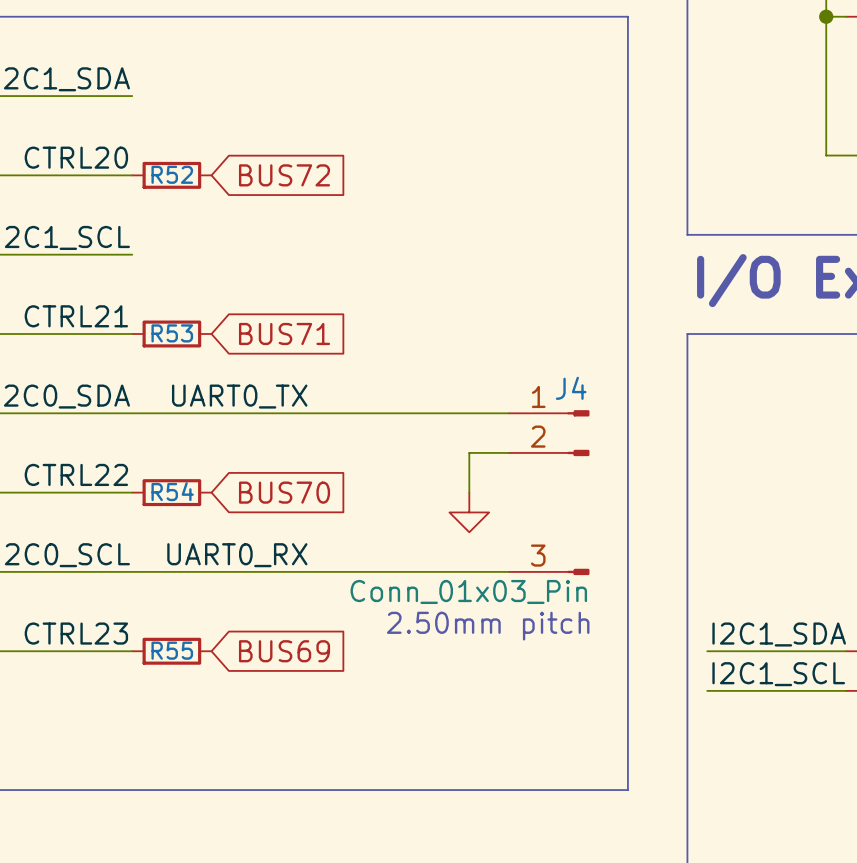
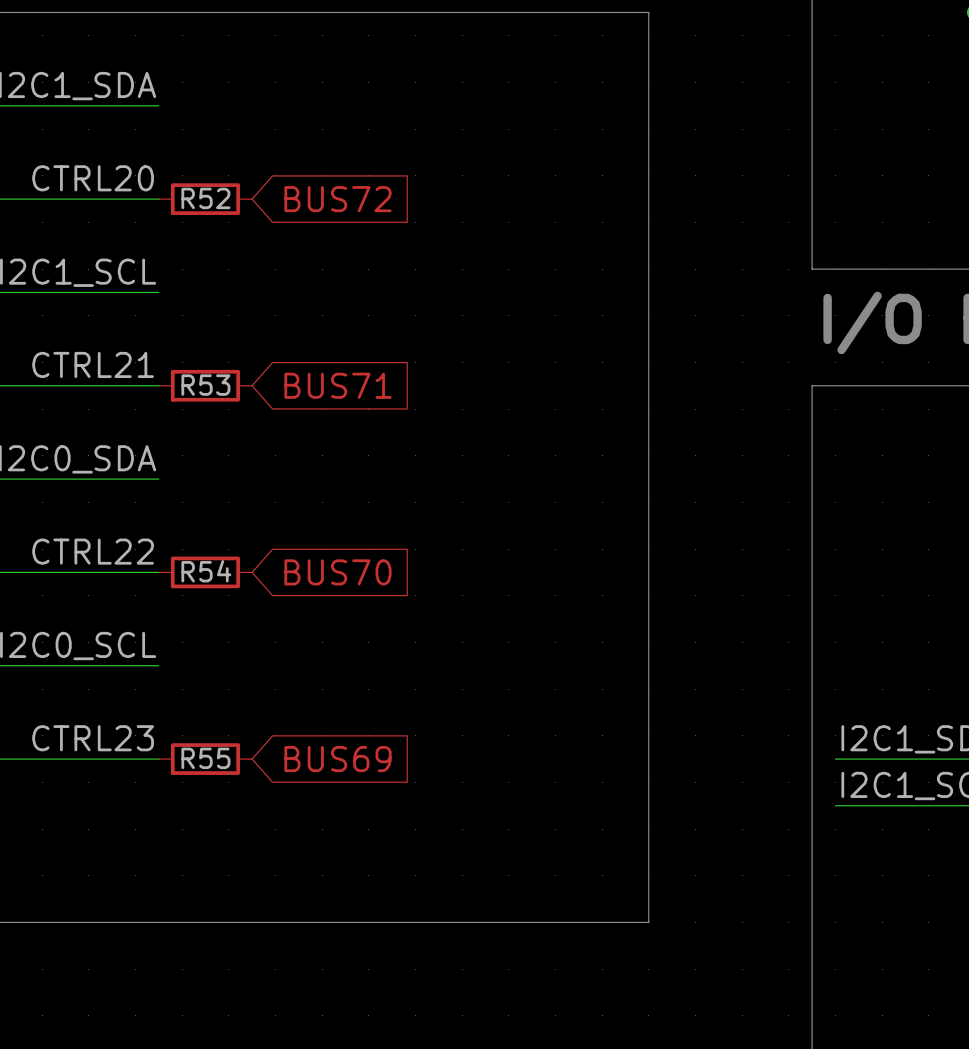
line: (548, 16) (627, 16) (627, 790) (548, 790) -> (648, 12) (648, 922)
label: UART0_TX (239, 396) -> none
wire: (132, 413) (508, 413) -> none
wire: (508, 452) (469, 452) (469, 492) -> none
J4: Conn_01x03_Pin (549, 492) -> none
power symbol: (469, 512) -> none
label: UART0_RX (237, 555) -> none
wire: (132, 571) (508, 571) -> none
text: 2.50mm pitch (488, 626) -> none

